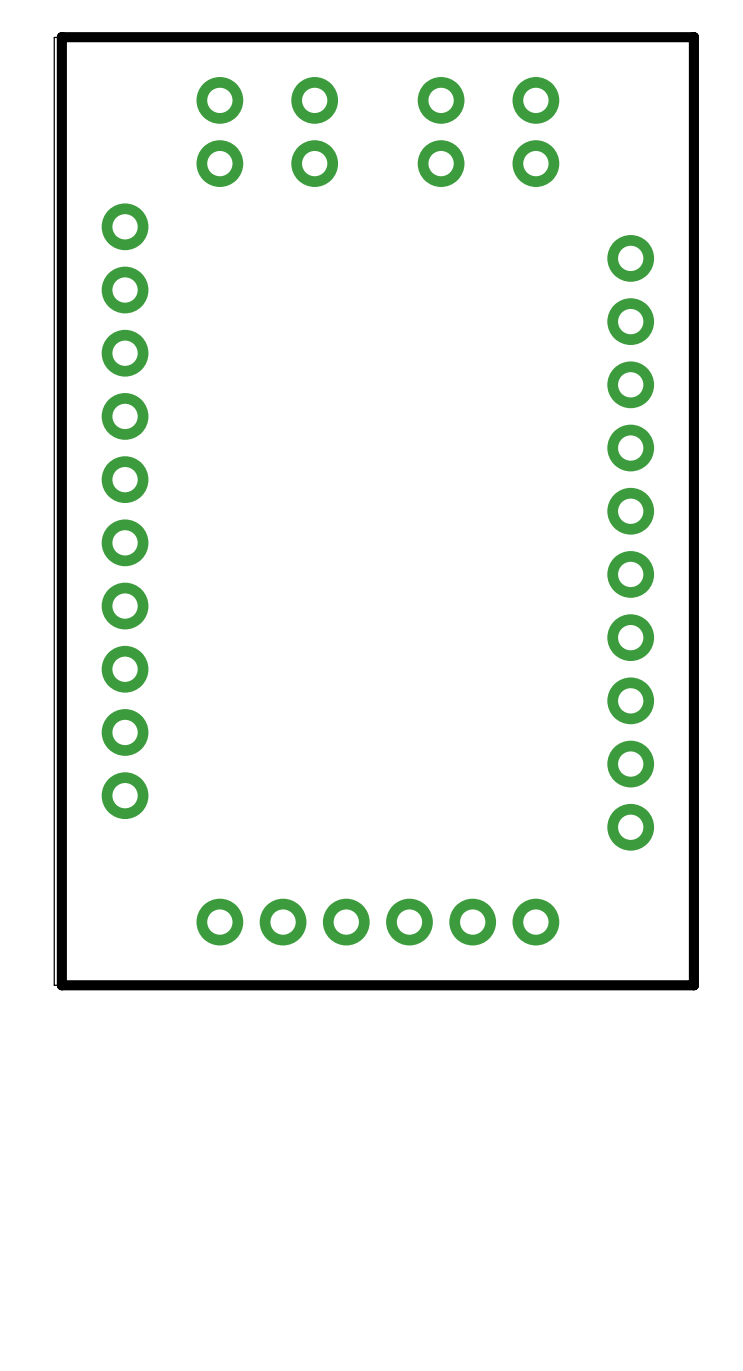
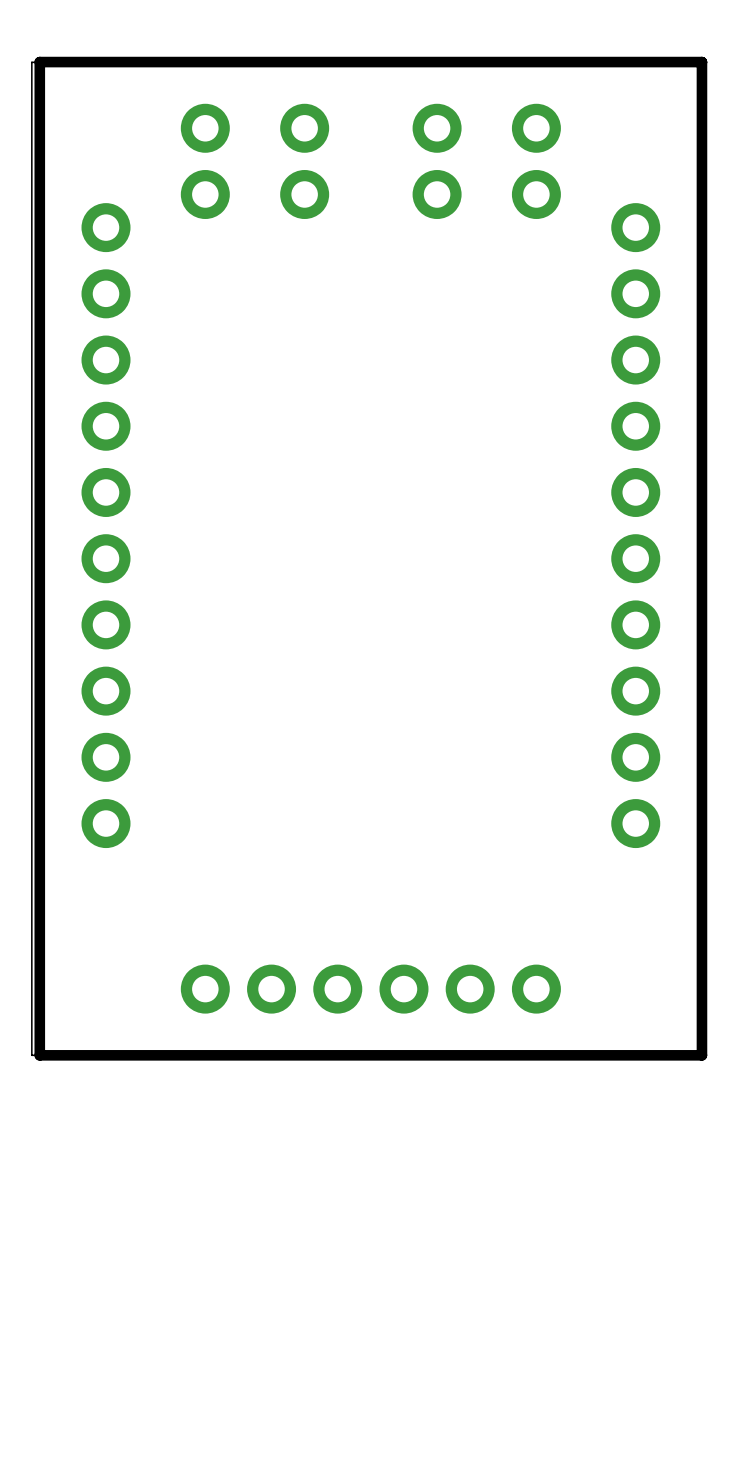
part position: (125, 511) -> (106, 525)
part position: (630, 542) -> (635, 525)

